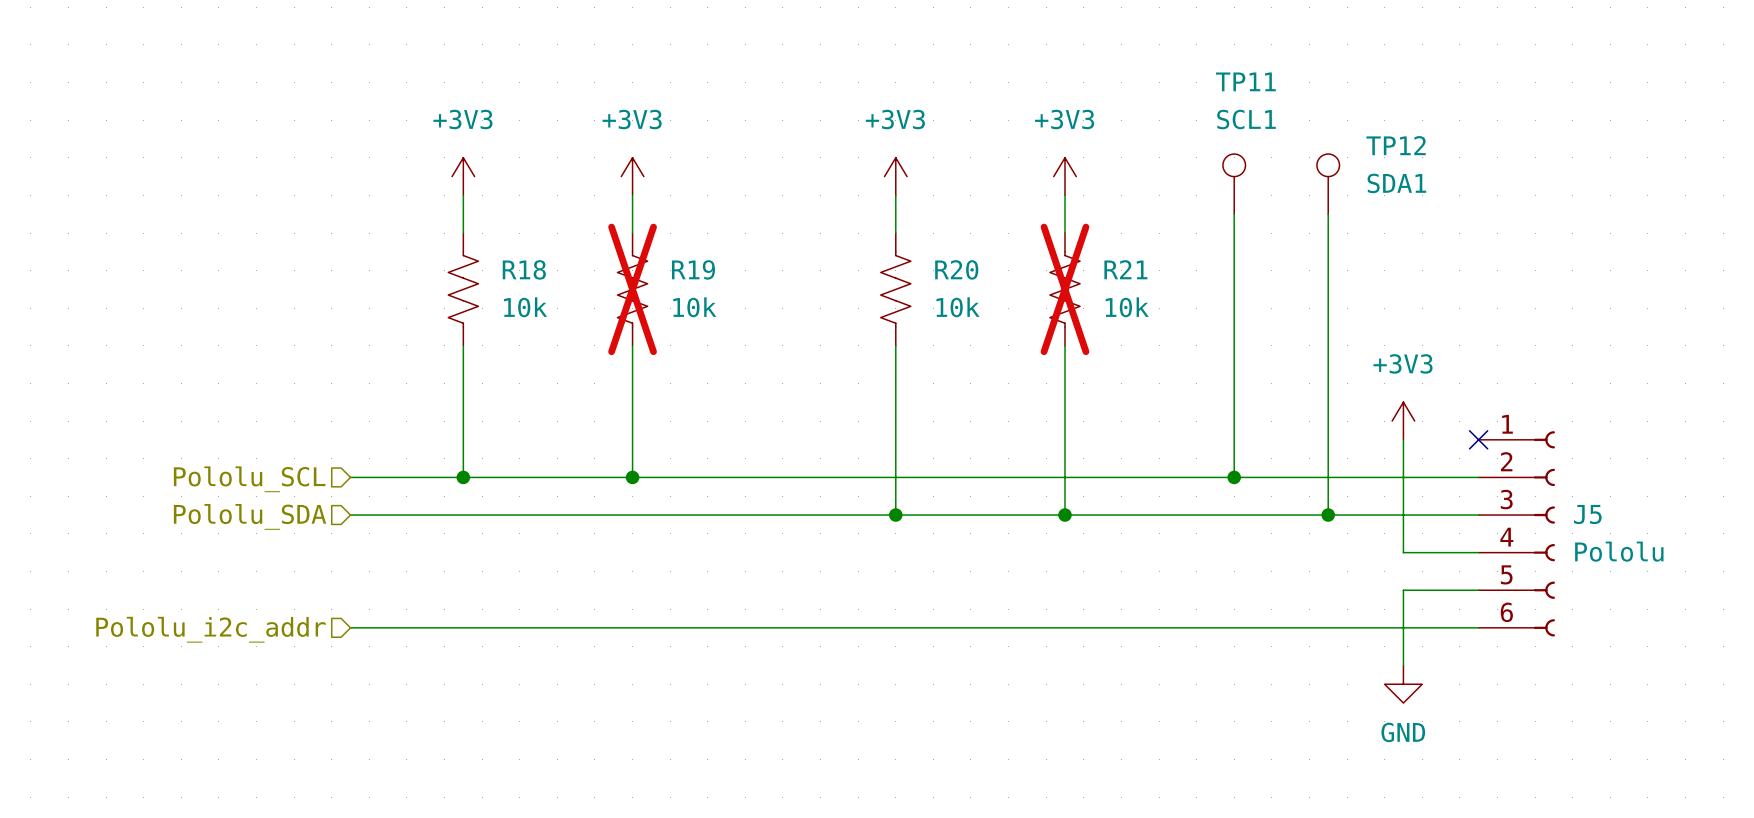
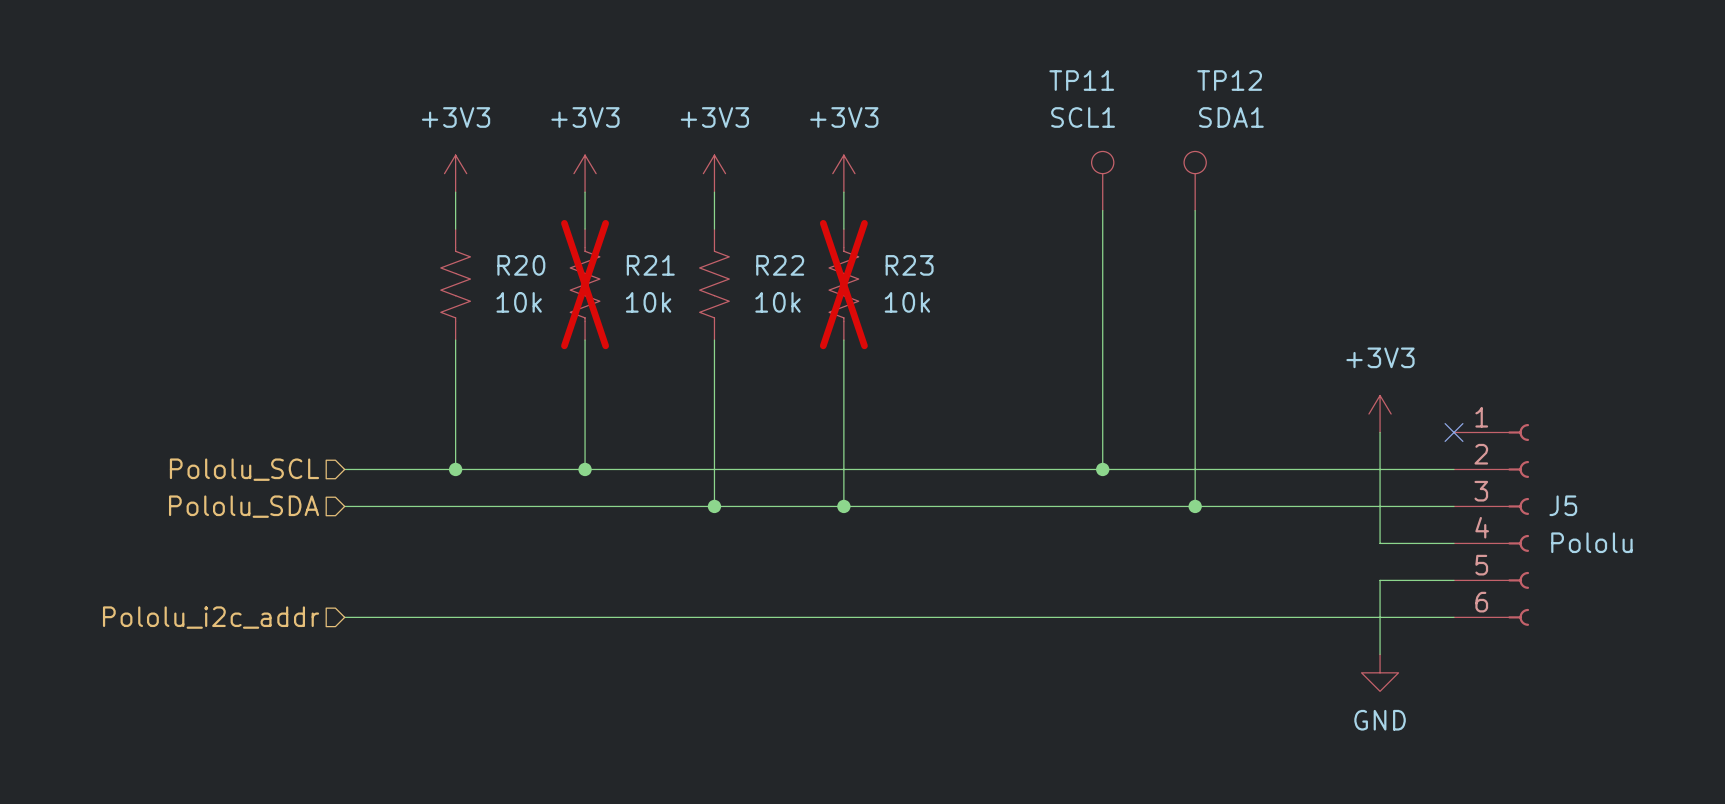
TP11 name position: TP11 (1245, 81) -> TP11 (1081, 80)
TP11 value position: SCL1 (1246, 119) -> SCL1 (1083, 117)
TP12 name position: TP12 (1396, 145) -> TP12 (1229, 80)
power symbol position: +3V3 (632, 176) -> +3V3 (585, 173)
power symbol: none -> +3V3 (714, 173)
power symbol position: +3V3 (895, 176) -> +3V3 (843, 173)
power symbol: +3V3 (1064, 176) -> none
TP12 value position: SDA1 (1396, 183) -> SDA1 (1231, 117)
TP11 position: (1234, 184) -> (1102, 181)
TP12 position: (1328, 184) -> (1195, 181)
wire: (632, 195) (632, 233) -> (585, 192) (585, 229)
wire: (895, 195) (895, 233) -> (843, 192) (843, 229)
wire: (1064, 195) (1064, 233) -> (714, 192) (714, 229)
wire: (1234, 214) (1234, 477) -> (1102, 210) (1102, 469)
wire: (1328, 214) (1328, 515) -> (1195, 210) (1195, 506)
R18 name: R18 (524, 269) -> R20 (521, 265)
R19: 10k (632, 289) -> none
R22: none -> 10k (714, 284)
R23: none -> 10k (843, 284)
R20: 10k (895, 289) -> none
R21 position: (1064, 289) -> (585, 284)
wire: (632, 345) (632, 477) -> (585, 340) (585, 469)
wire: (895, 345) (895, 515) -> (843, 340) (843, 506)
wire: (1064, 345) (1064, 515) -> (714, 340) (714, 506)
junction position: (632, 477) -> (585, 469)
junction: none -> (1102, 469)
junction position: (1234, 477) -> (1195, 506)
junction: none -> (714, 506)
junction position: (895, 515) -> (843, 506)
junction: (1064, 515) -> none
junction: (1328, 515) -> none

